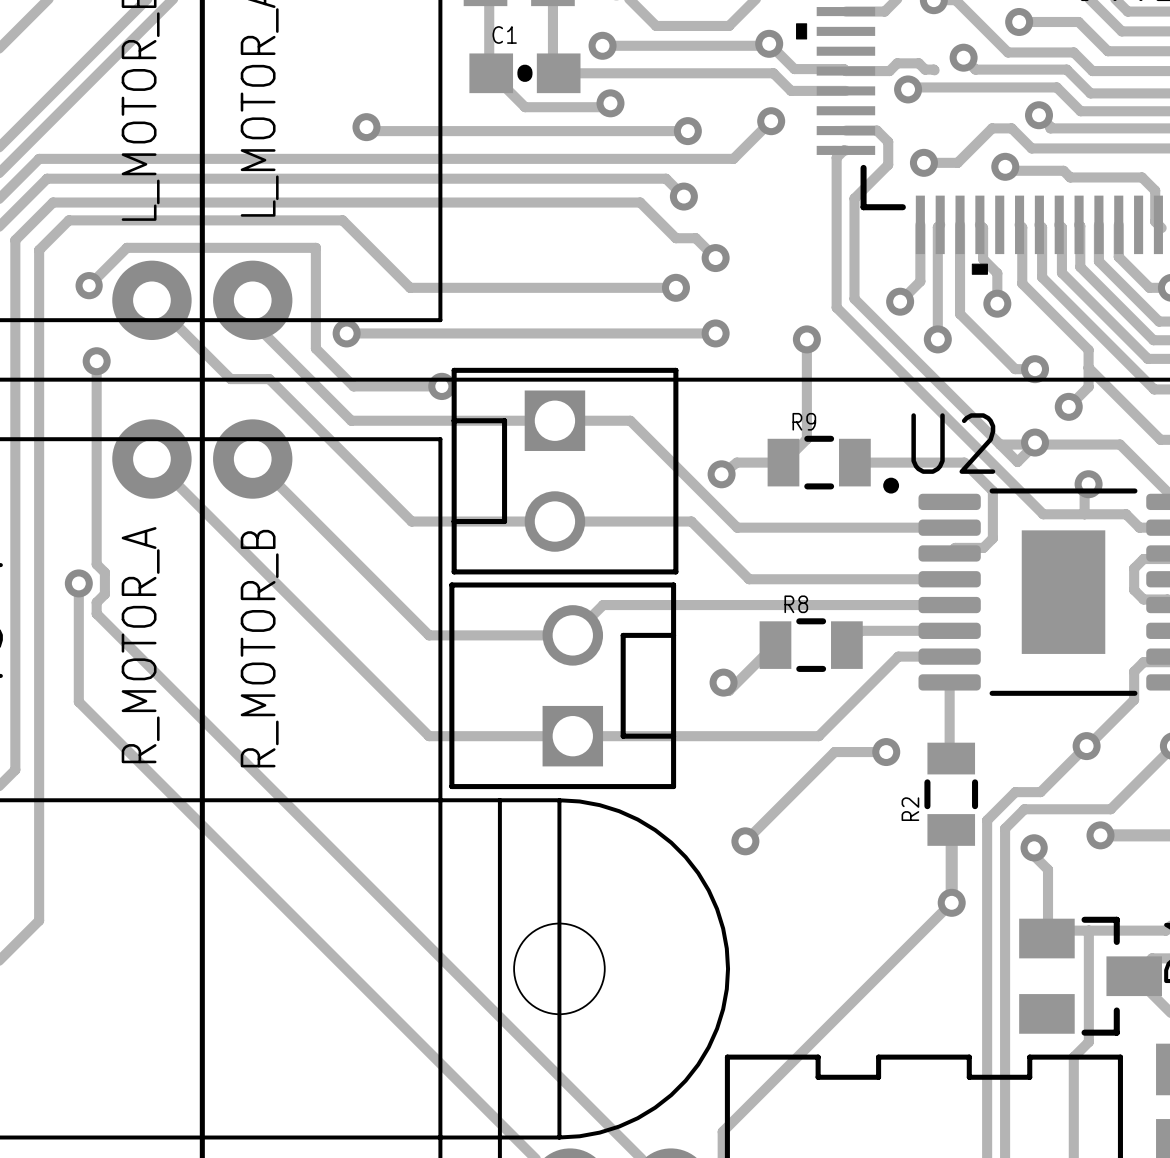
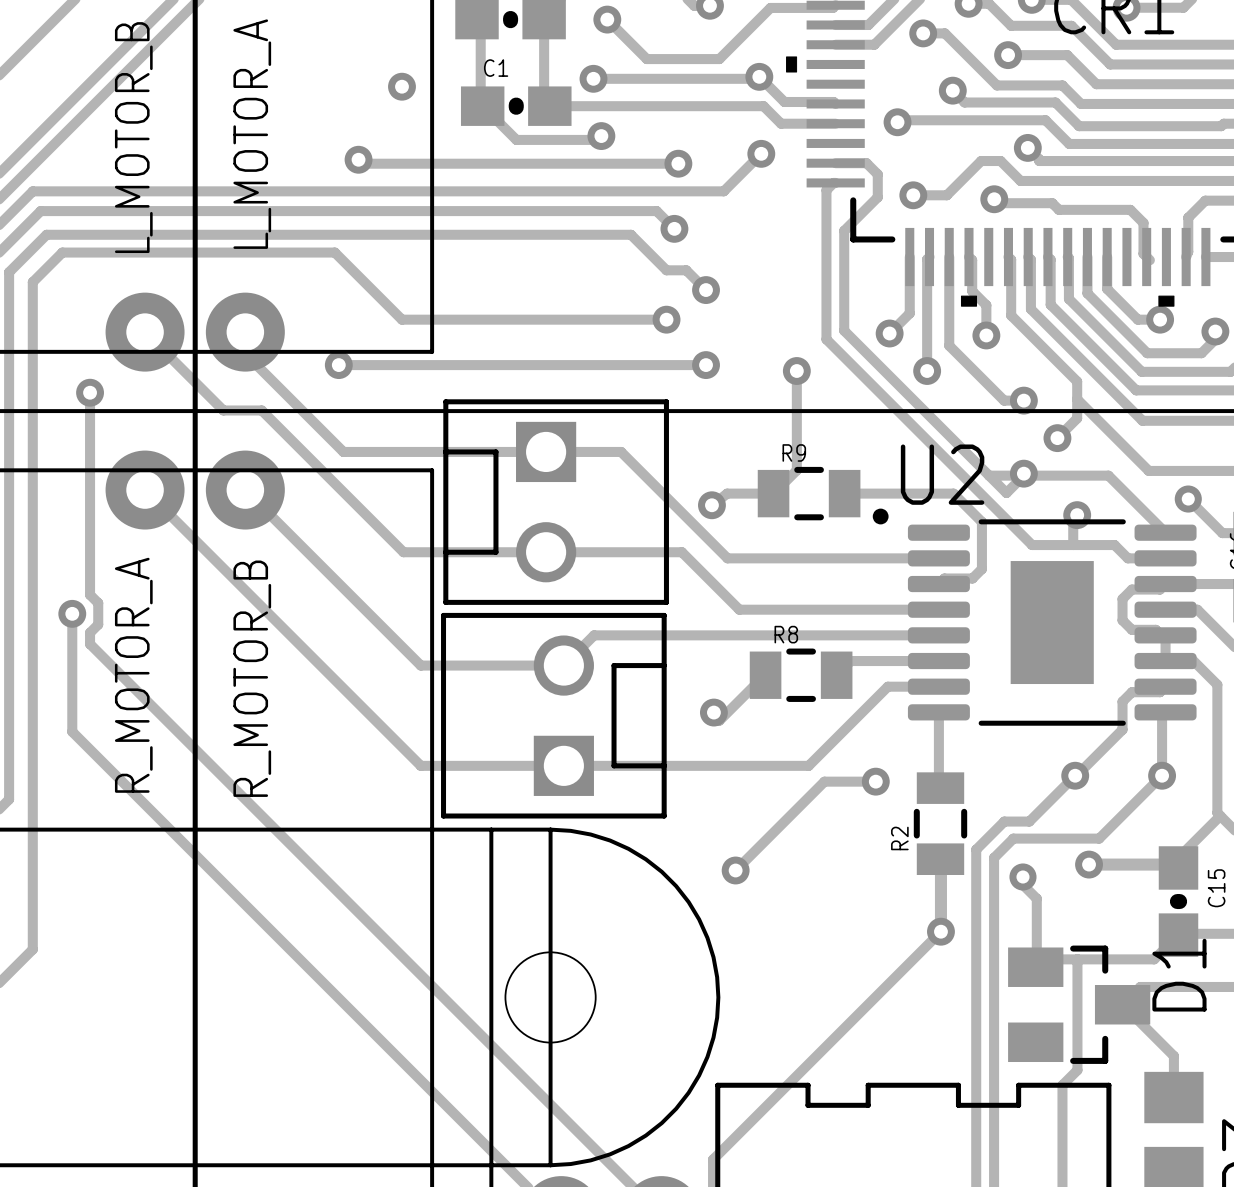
via: none -> (401, 86)
track: (934, 70) (925, 69) (918, 63) (897, 63) (889, 71) (845, 71) -> none
track: (89, 285) (126, 247) (315, 247) (315, 348) (353, 386) (441, 386) -> none
via: (89, 285) -> none
via: (441, 386) -> none

